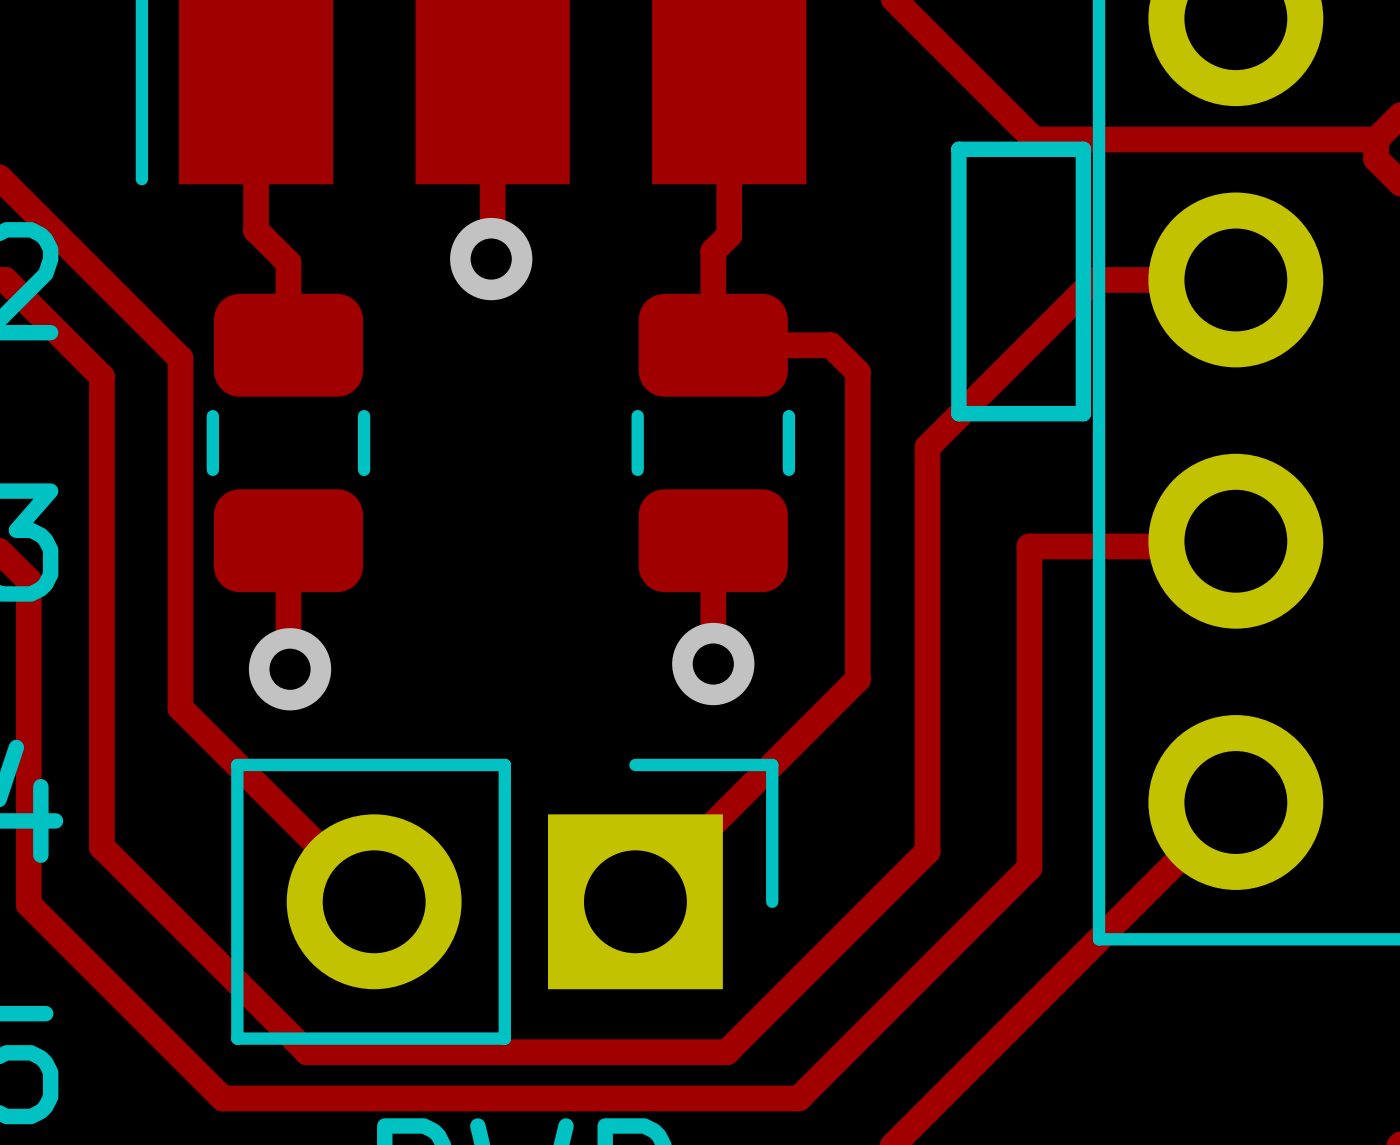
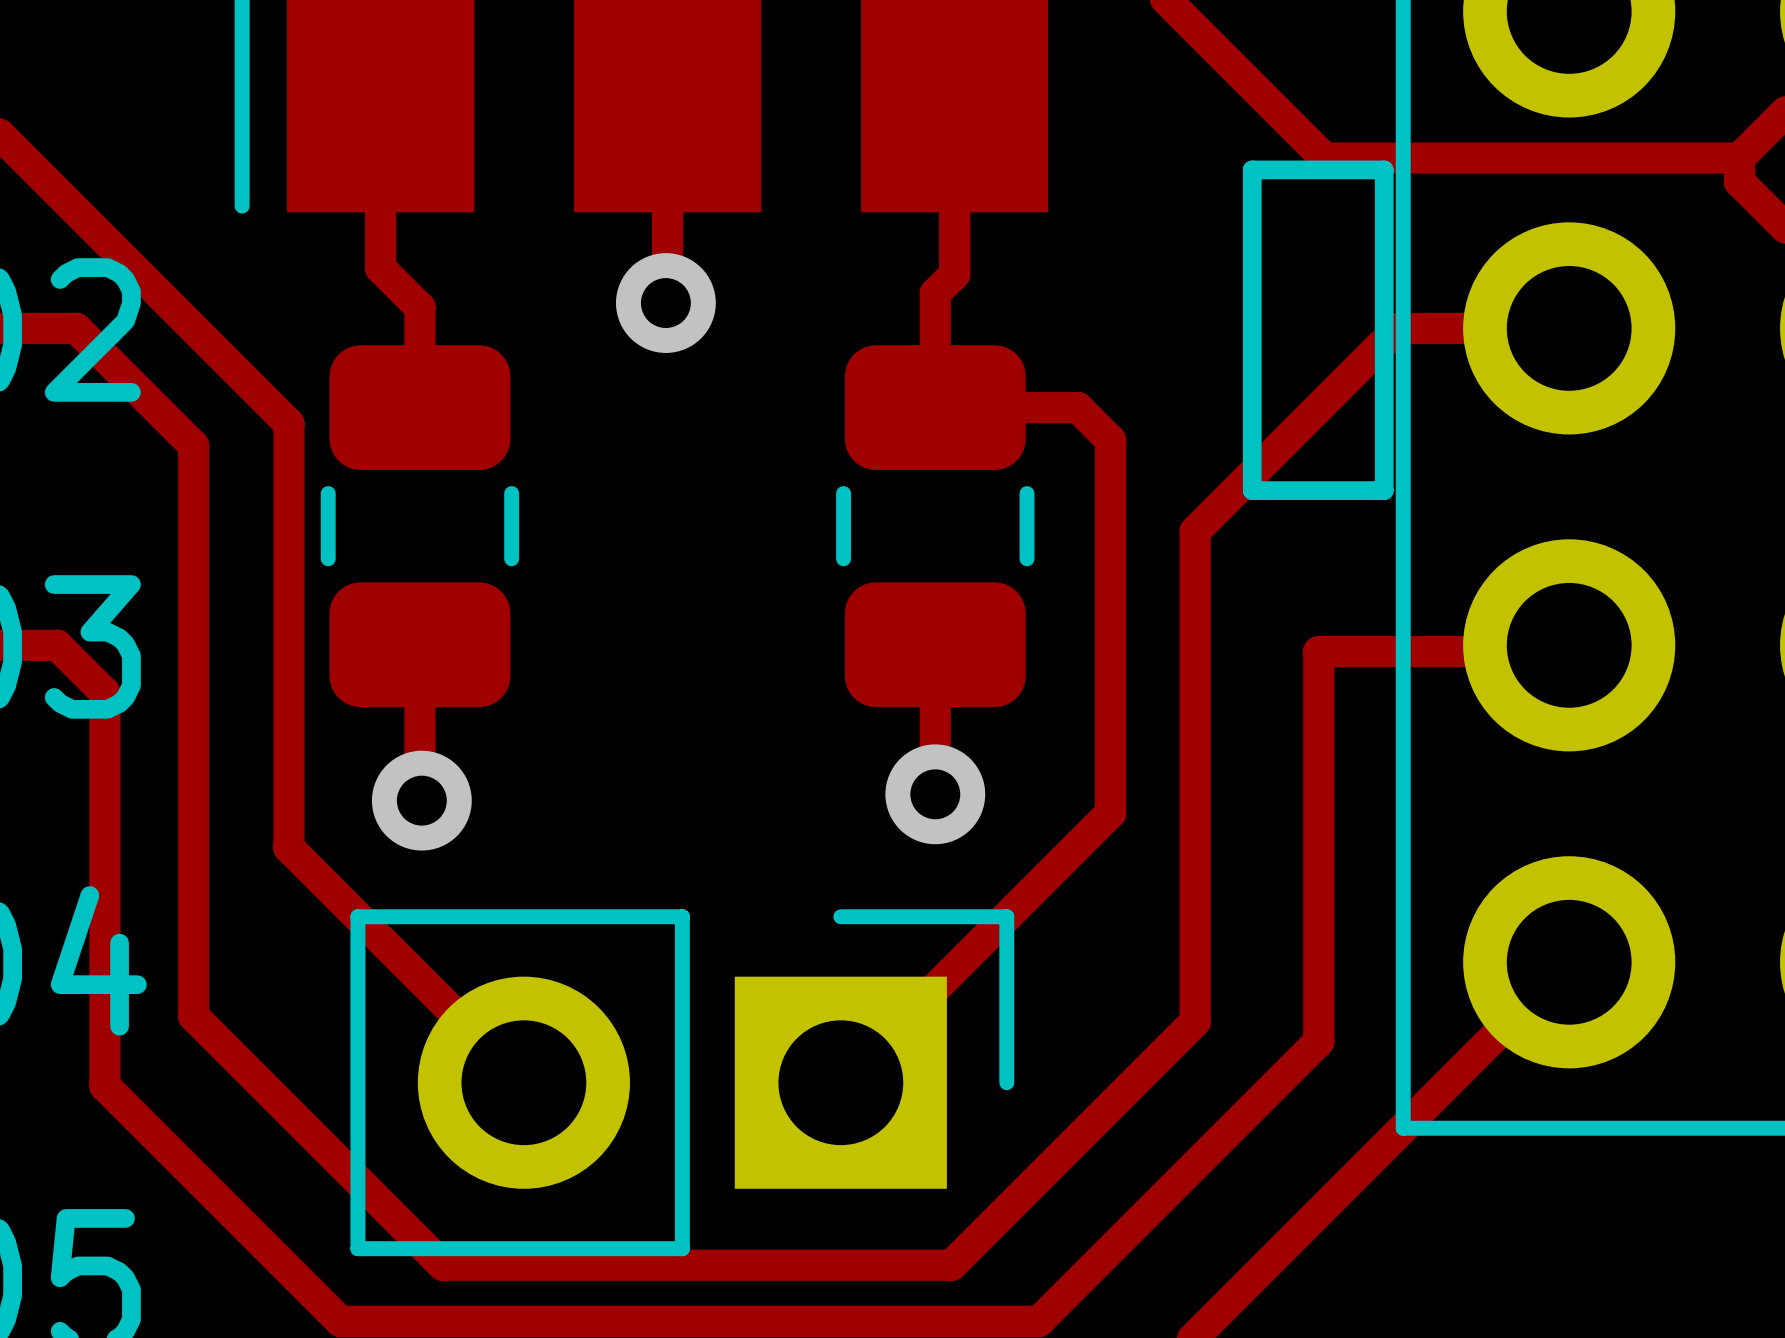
line: (974, 149) (958, 149) (958, 413) (974, 413) -> (1252, 169) (1252, 490)

